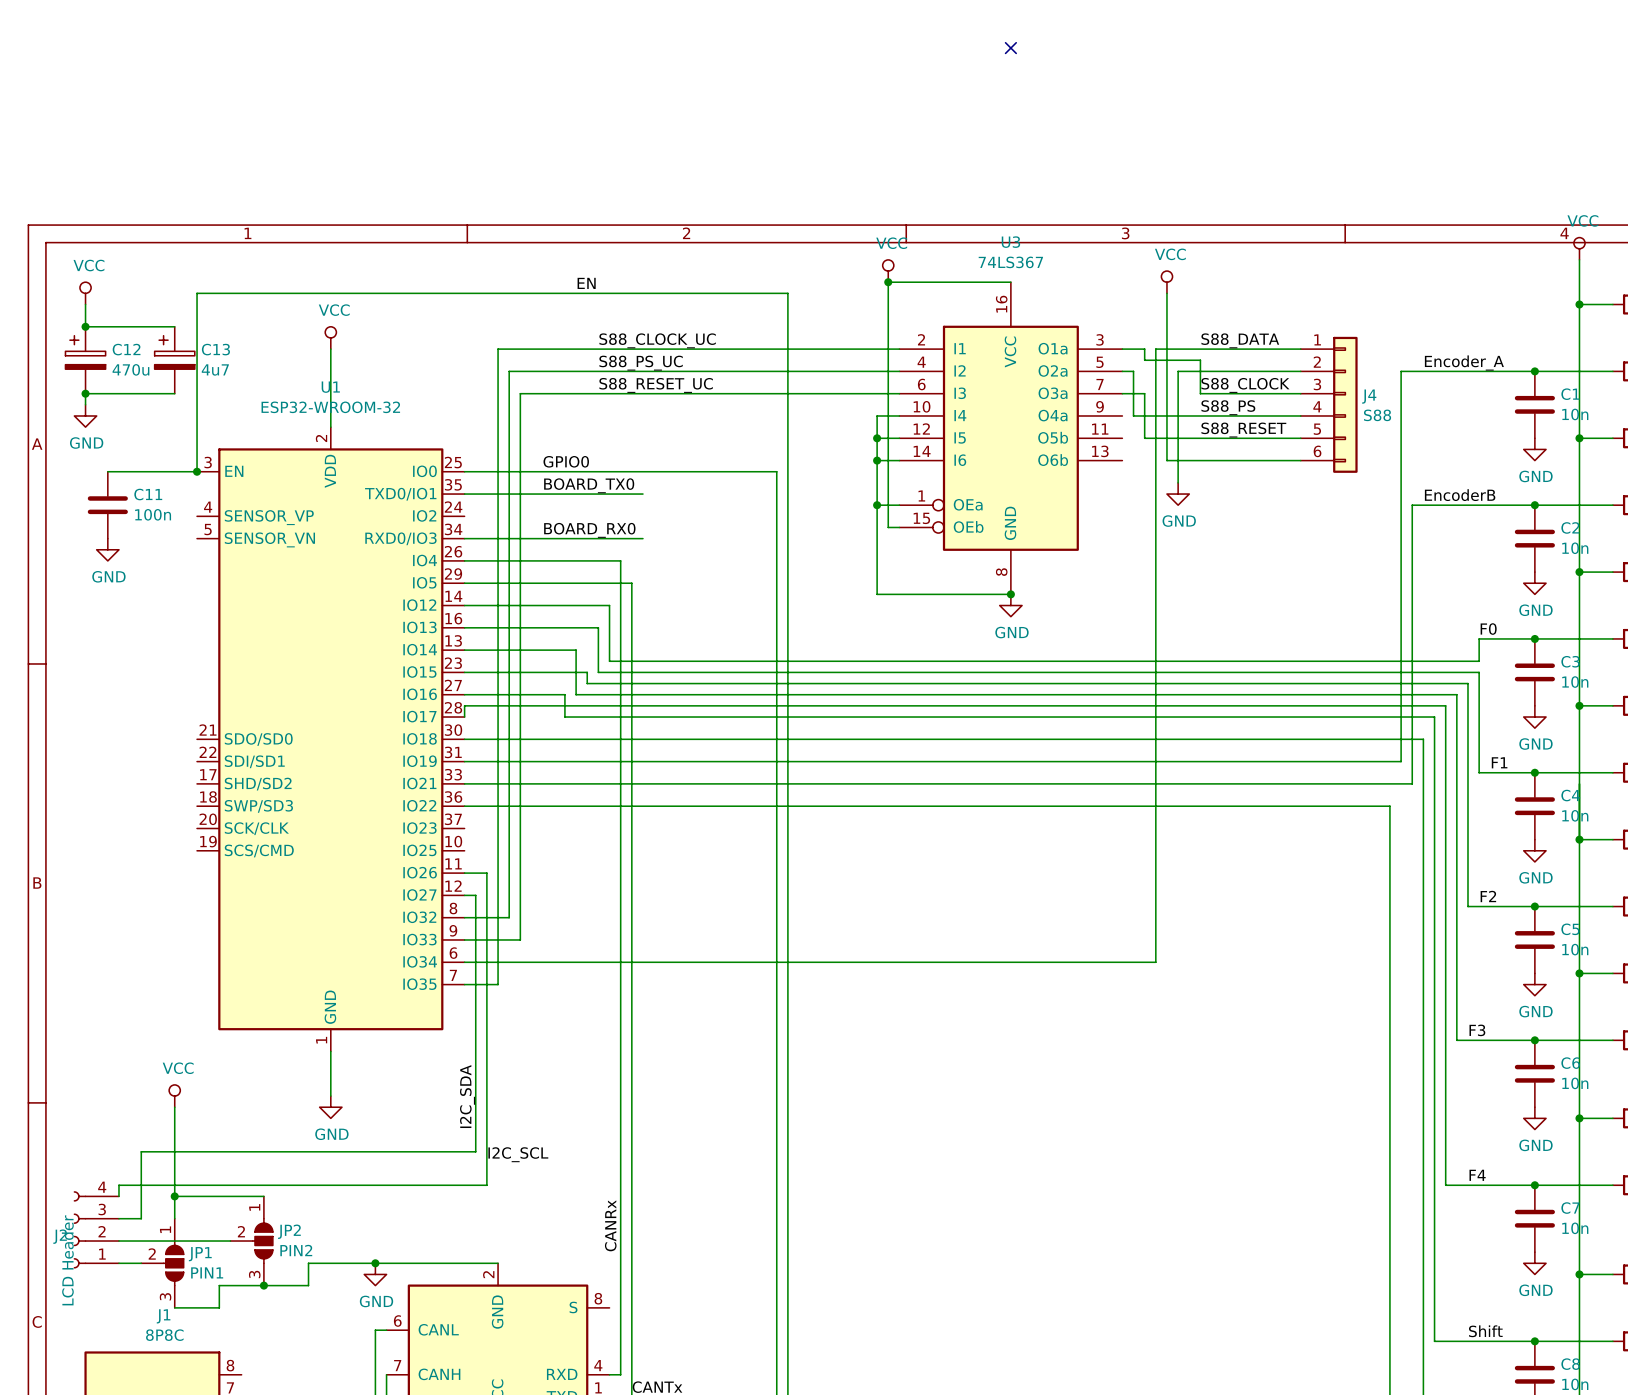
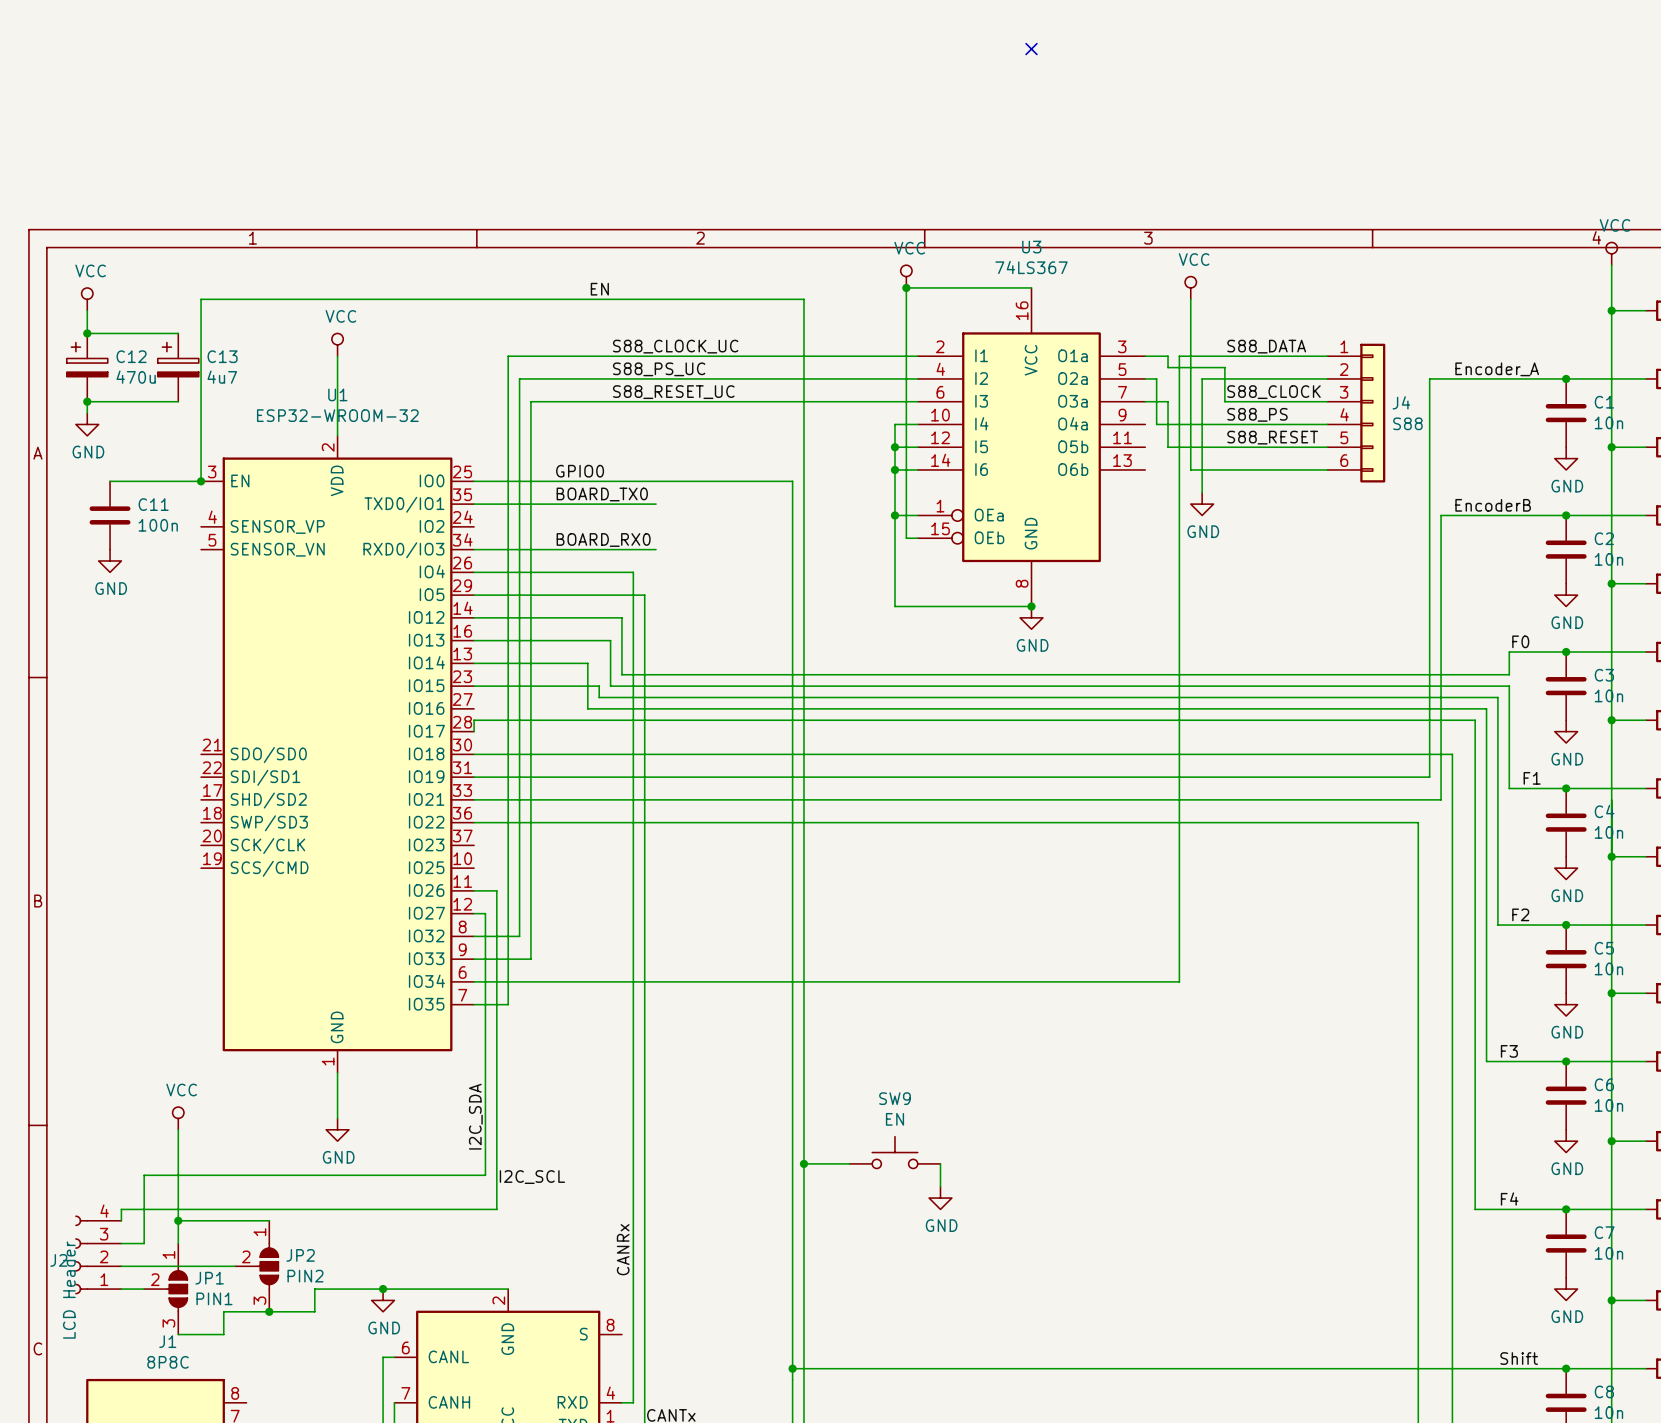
wire: (464, 694) (564, 694) (564, 717) (1434, 717) (1434, 1341) -> (792, 1368) (1463, 1368)
SW9: none -> EN (894, 1152)
wire: none -> (803, 1163) (849, 1163)
junction: none -> (803, 1163)
wire: none -> (940, 1163) (940, 1186)
power symbol: none -> GND (940, 1198)
junction: none -> (792, 1368)

